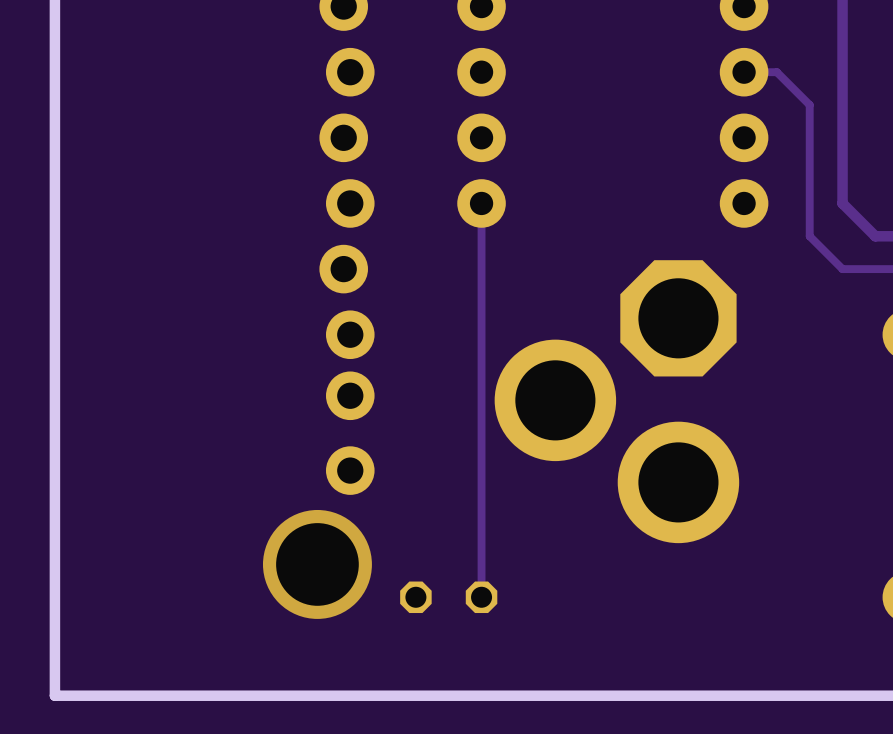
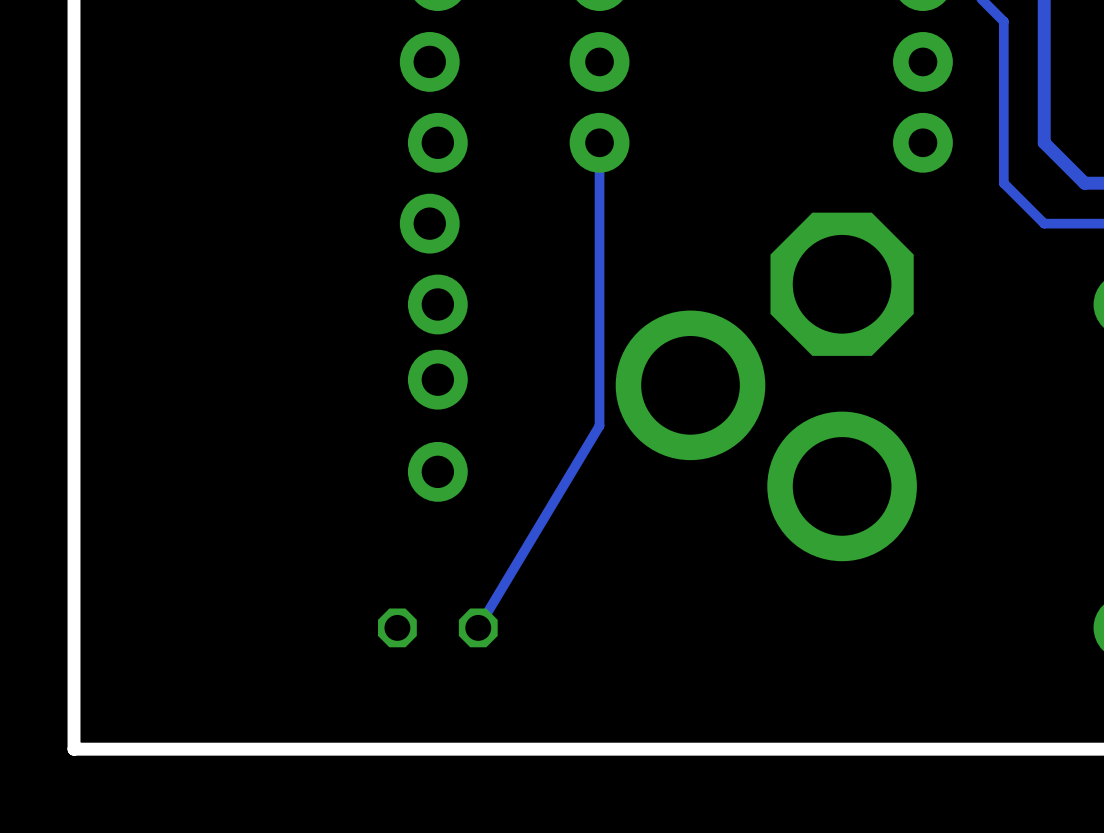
track: (481, 433) (481, 597) -> (599, 425) (478, 627)
via: (317, 564) -> none
part position: (448, 597) -> (437, 627)

